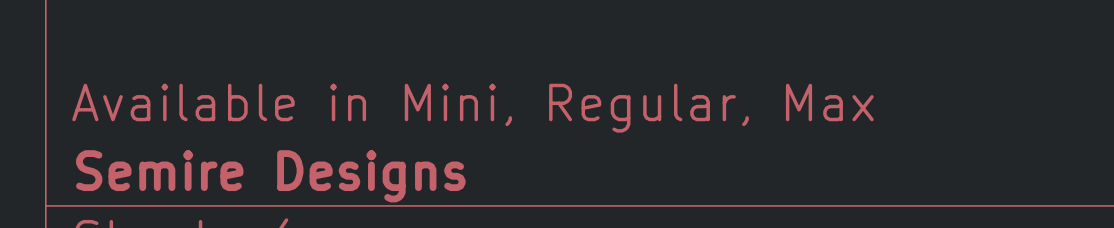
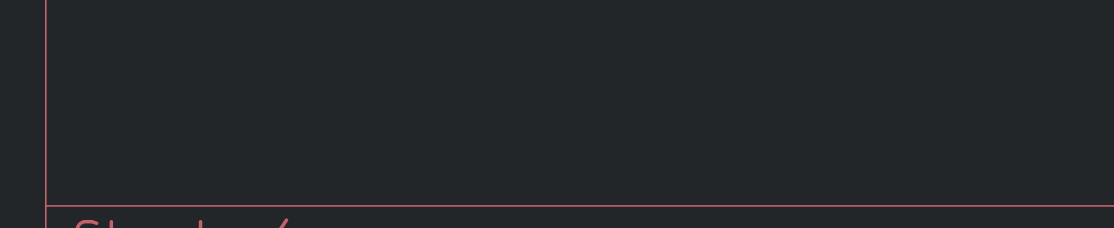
title block: Available in Mini, Regular, Max (473, 108) -> none
title block: Semire Designs (270, 176) -> none

